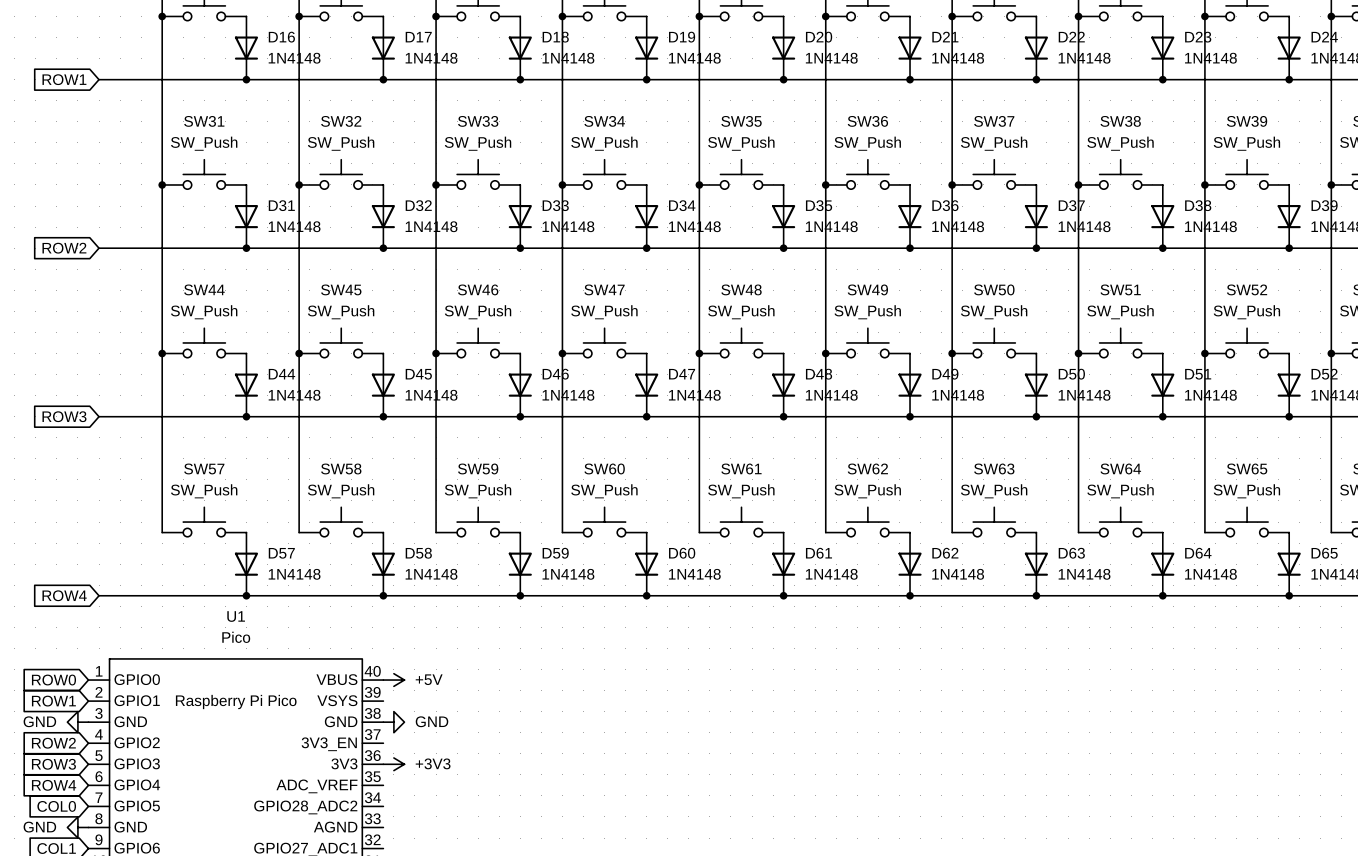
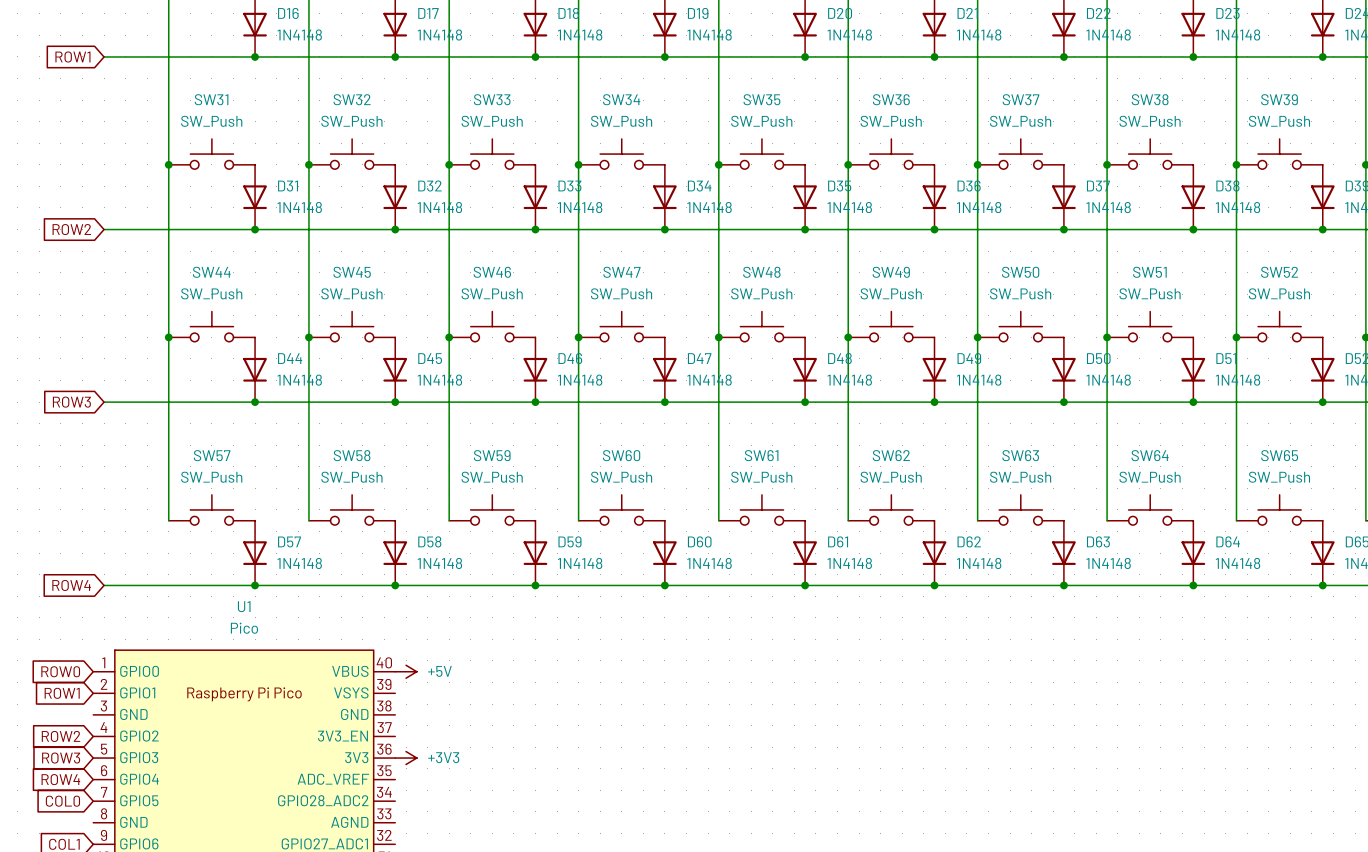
power symbol: GND (77, 722) -> none
power symbol: GND (393, 722) -> none
power symbol: GND (77, 827) -> none

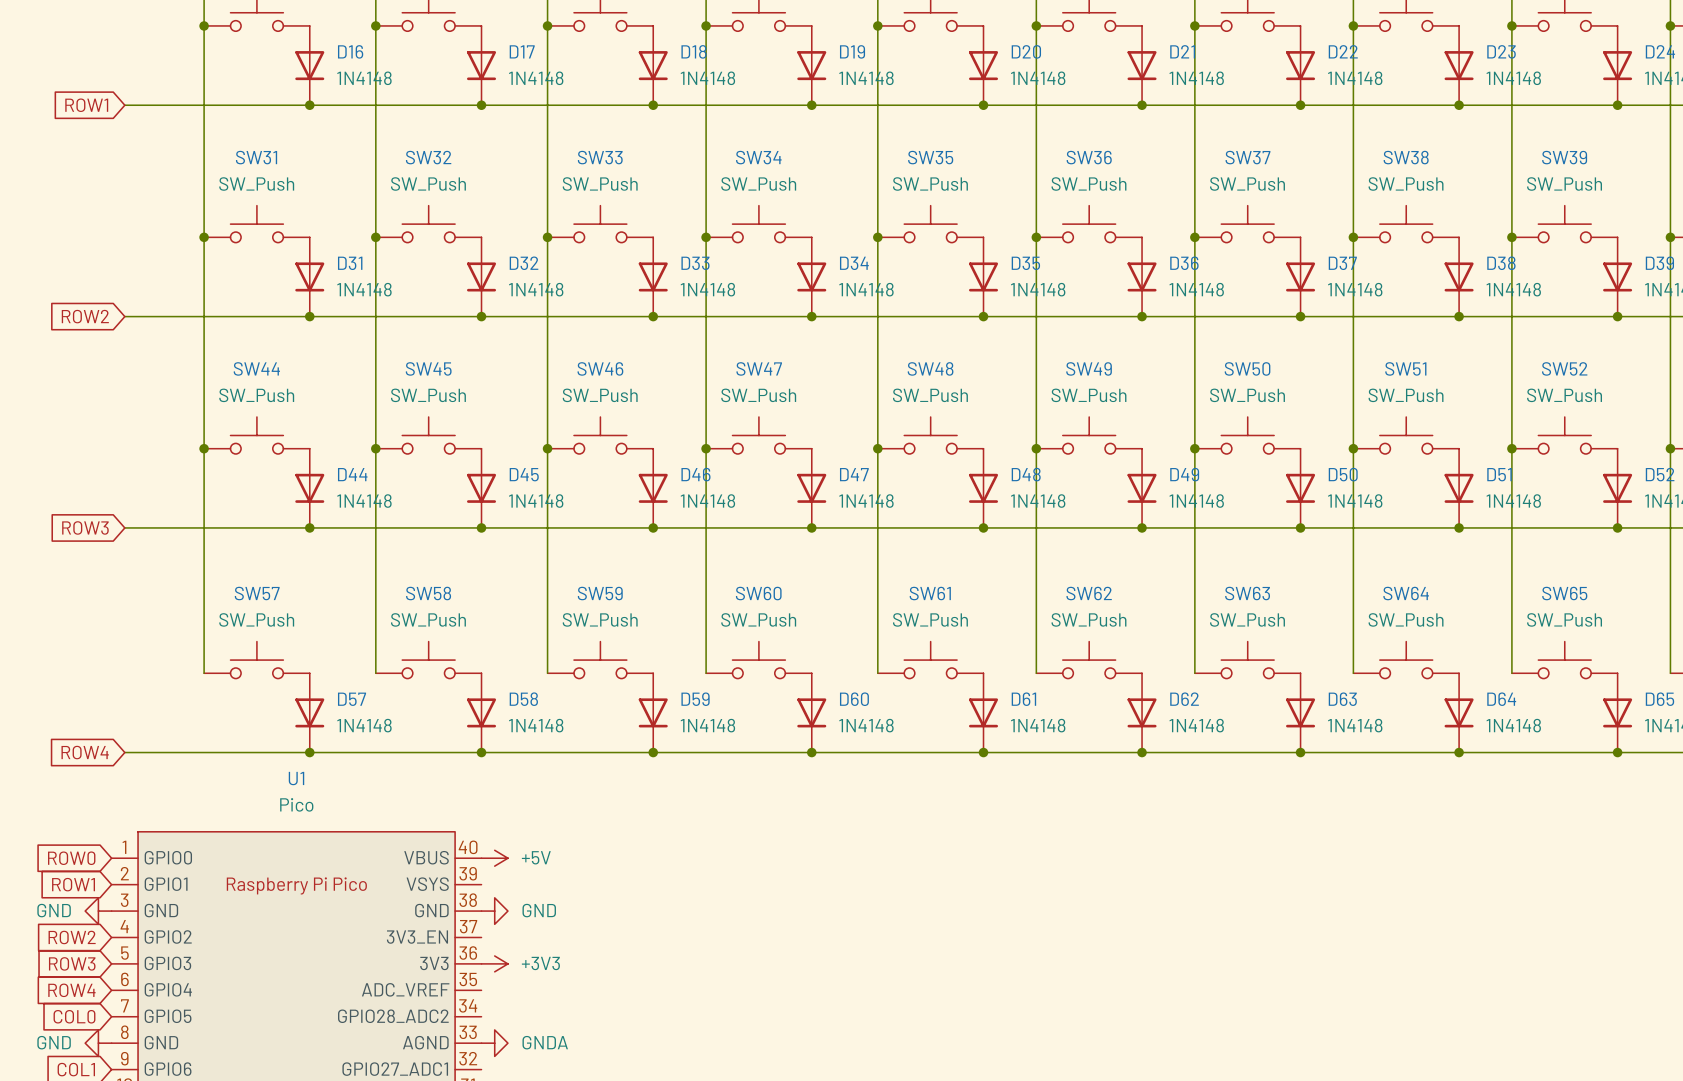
power symbol: none -> GND (98, 911)
power symbol: none -> GND (494, 911)
power symbol: none -> GND (98, 1043)
power symbol: none -> GNDA (494, 1043)

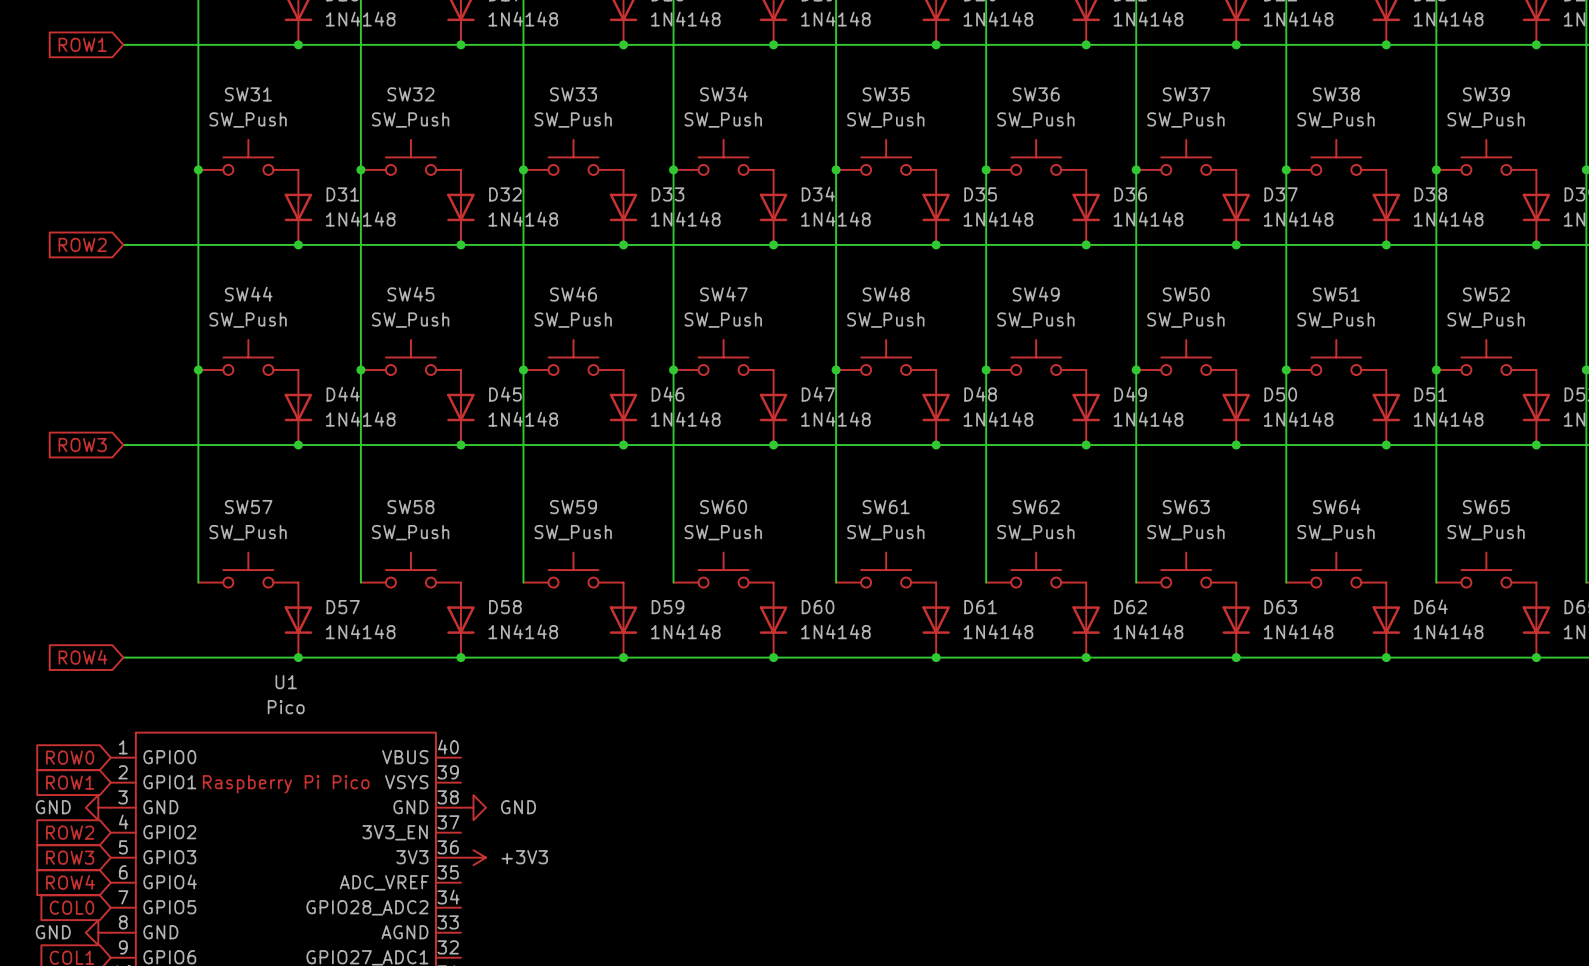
power symbol: +5V (494, 858) -> none
power symbol: GNDA (494, 1043) -> none

